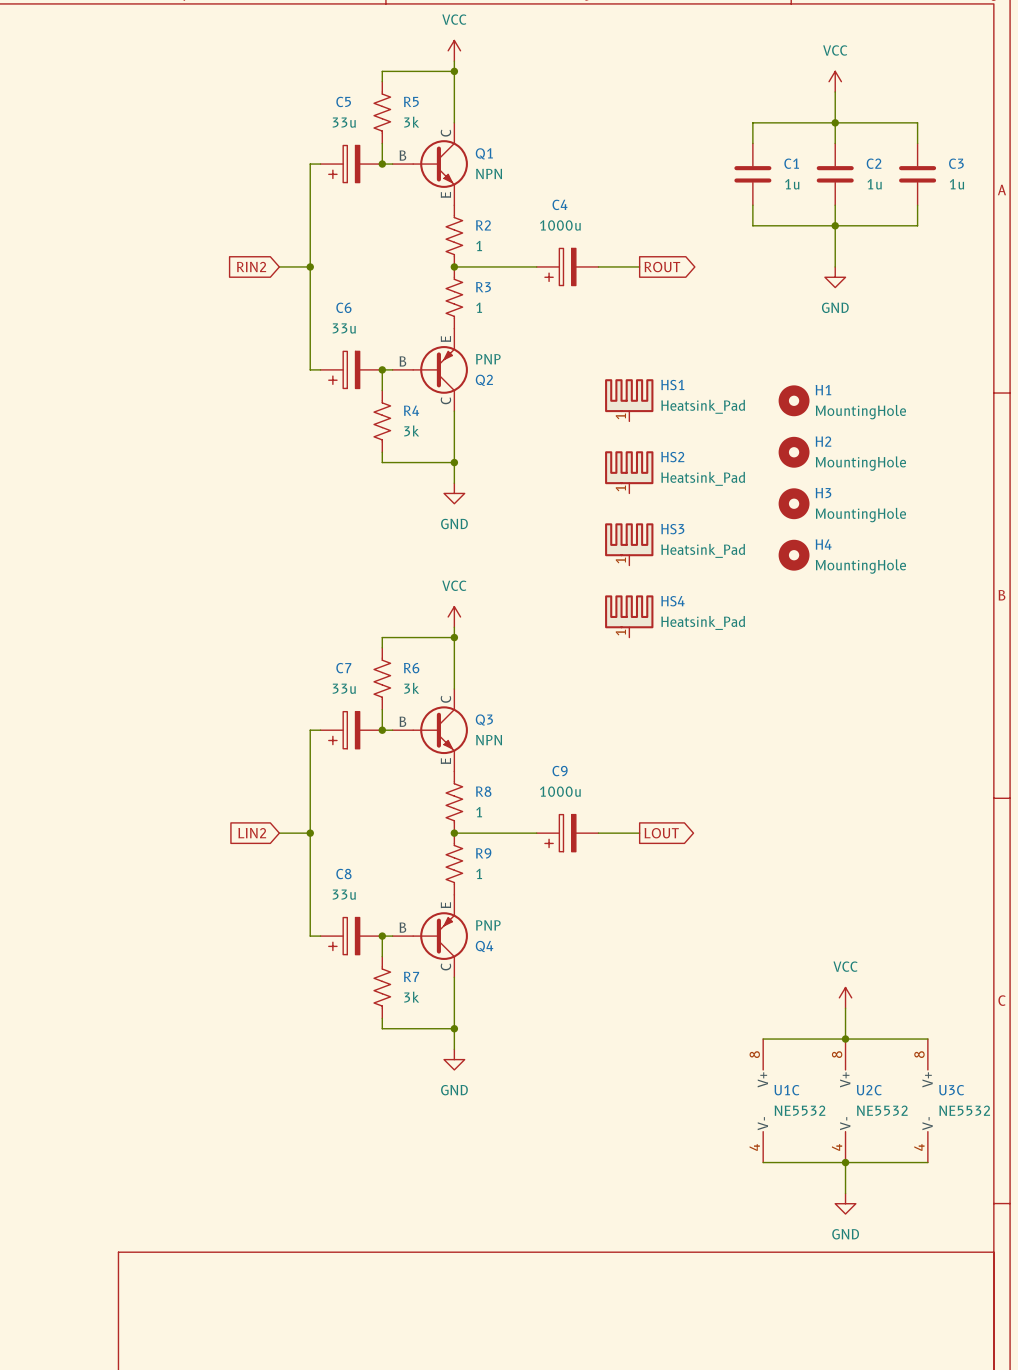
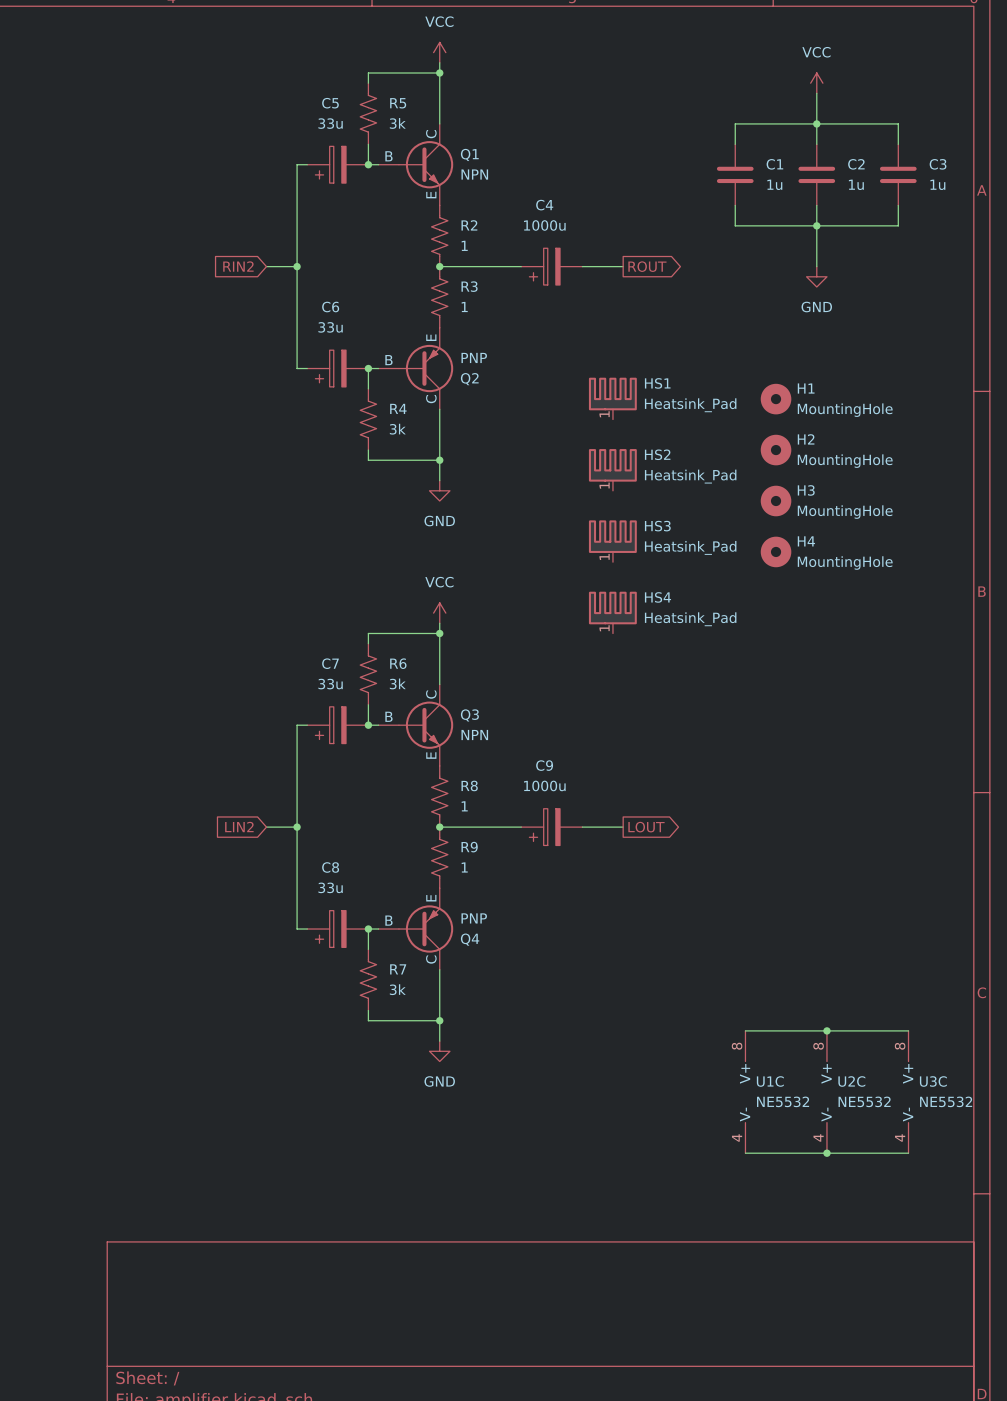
power symbol: VCC (845, 997) -> none
wire: (845, 1008) (845, 1039) -> none
wire: (845, 1162) (845, 1193) -> none
power symbol: GND (845, 1203) -> none

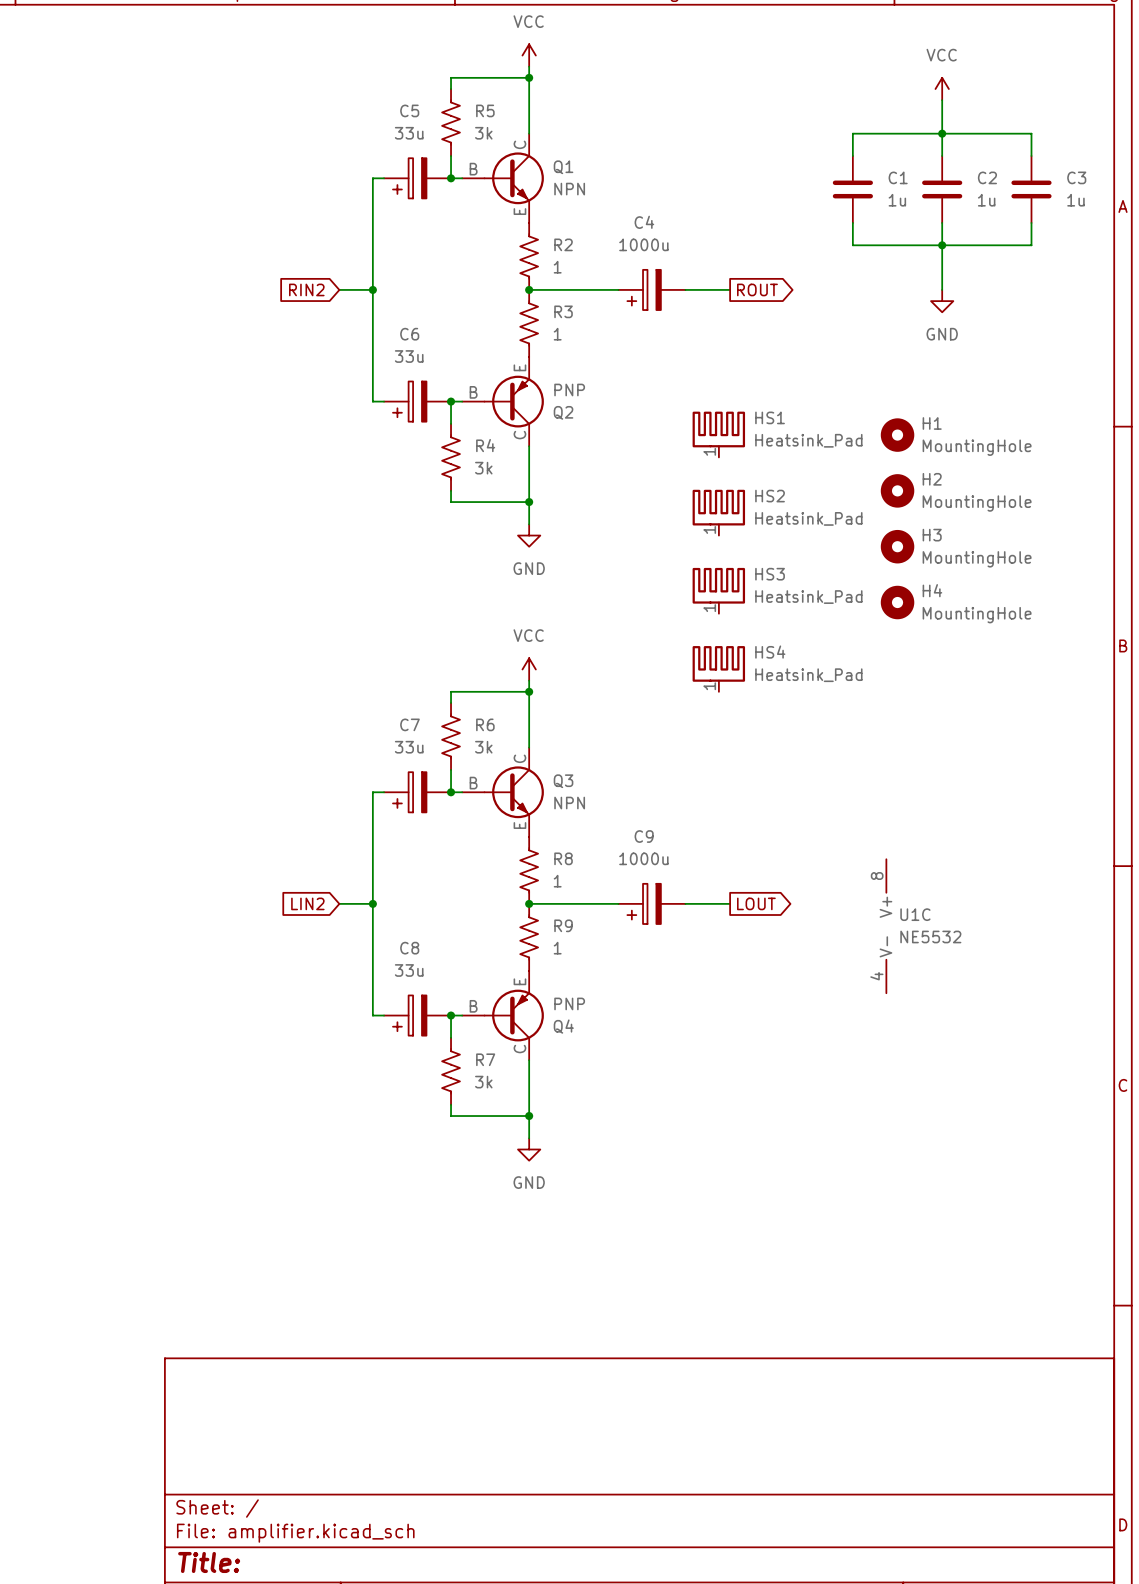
wire: (745, 1030) (908, 1030) -> none
junction: (826, 1030) -> none
U1C position: (745, 1092) -> (886, 926)
U2C: NE5532 (826, 1092) -> none
U3C: NE5532 (908, 1092) -> none
wire: (745, 1153) (908, 1153) -> none
junction: (826, 1153) -> none

